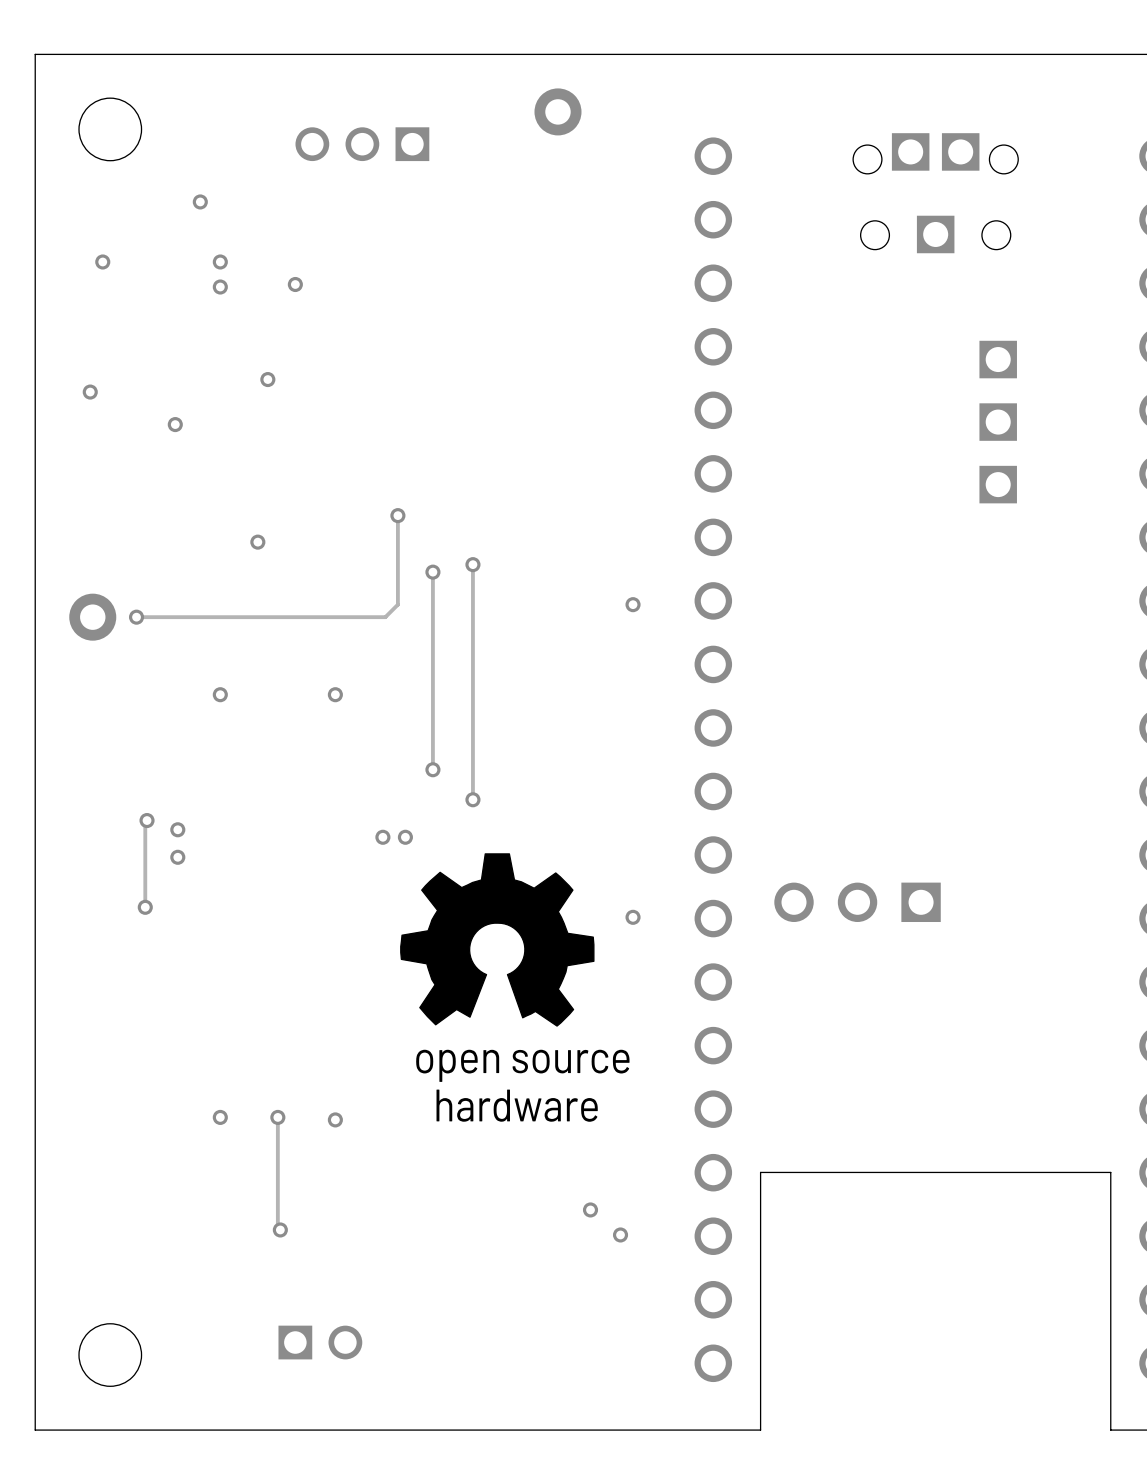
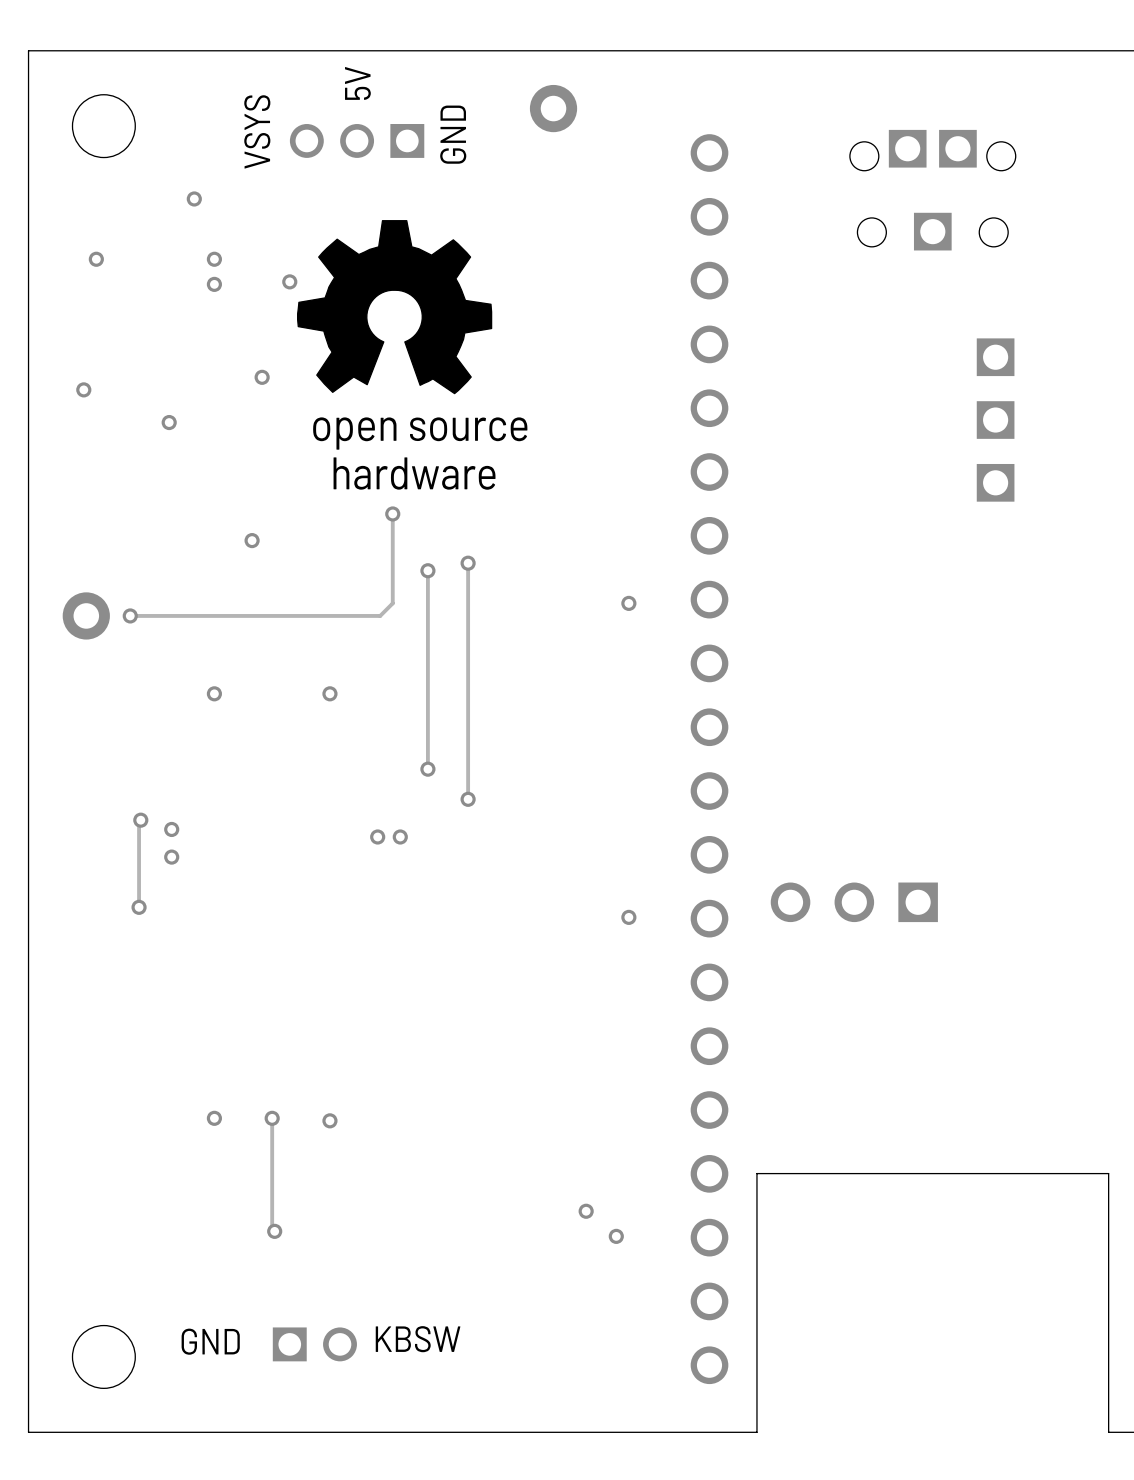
text: none -> 5V (357, 83)
text: none -> VSYS (257, 131)
text: none -> GND (453, 134)
drawing: none -> [297, 220, 493, 395]
drawing: [400, 853, 595, 1027] -> none
text: none -> KBSW (418, 1339)
text: none -> GND (210, 1341)

